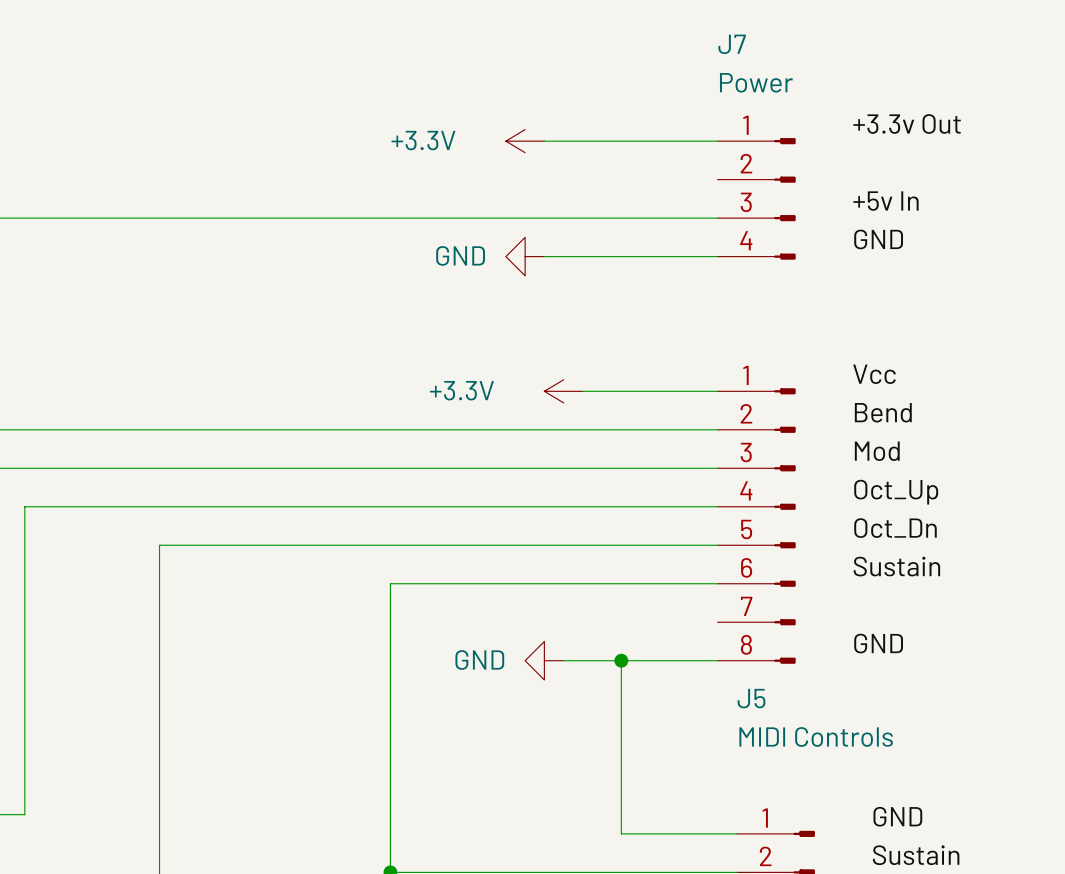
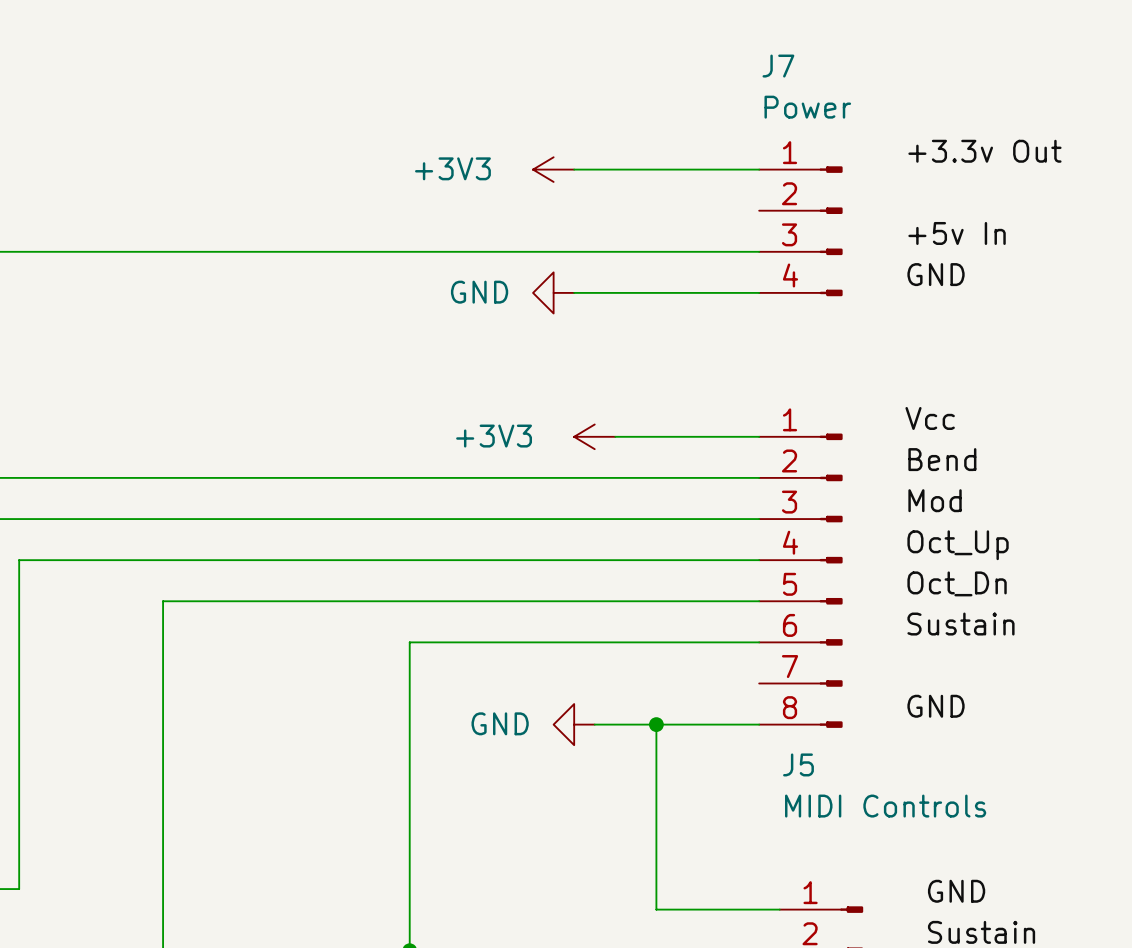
power symbol: +3.3V (525, 141) -> +3V3 (553, 169)
power symbol: +3.3V (563, 391) -> +3V3 (594, 436)

